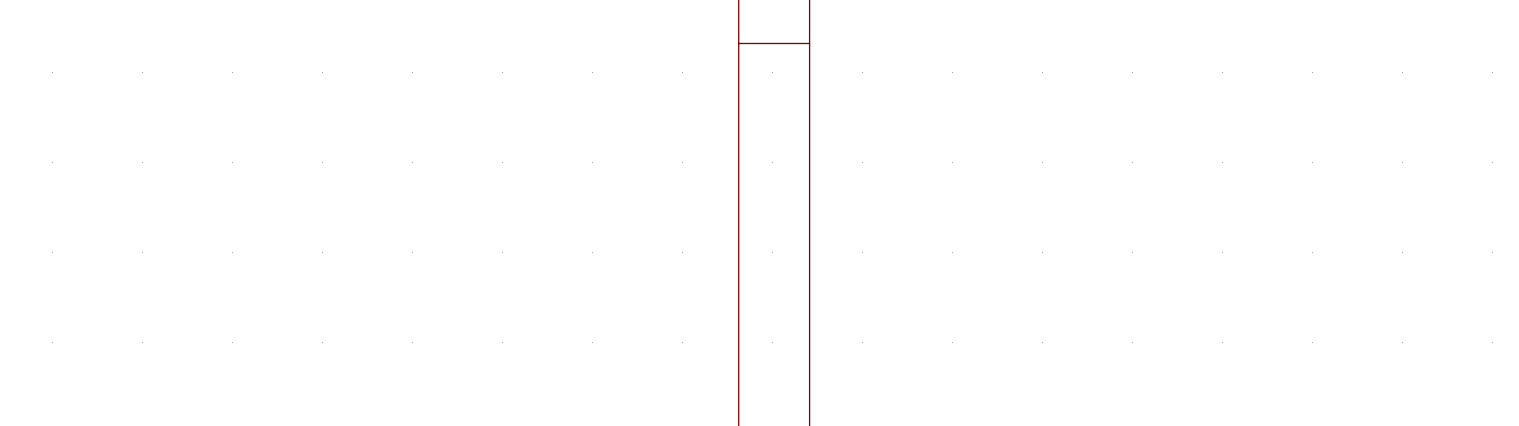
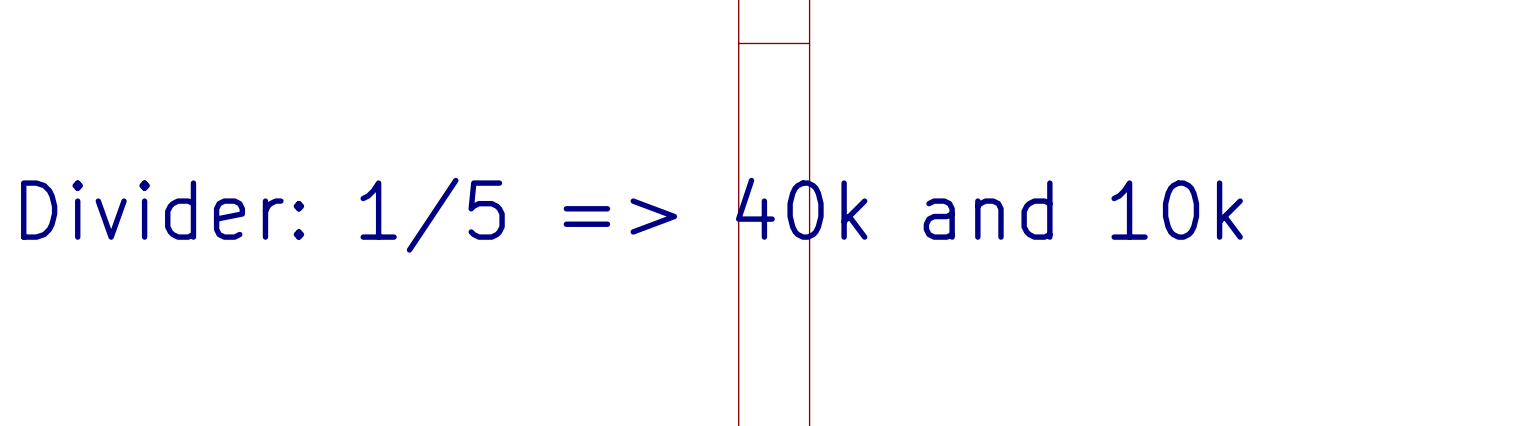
text: none -> Divider: 1/5 => 40k and 10k (631, 215)

